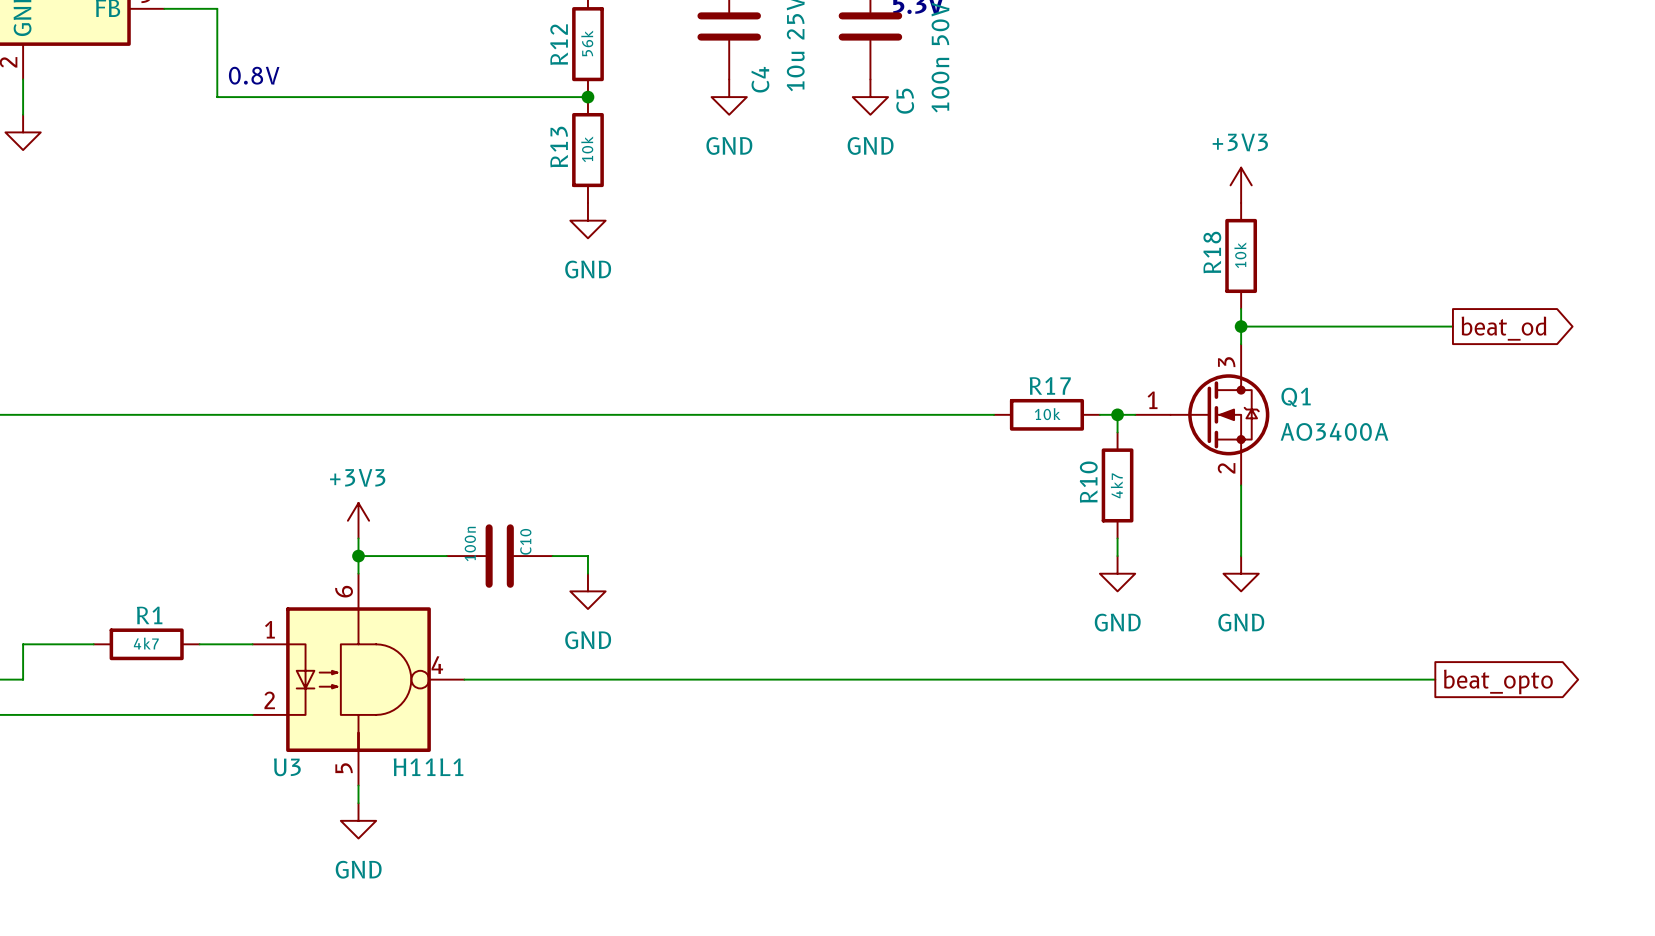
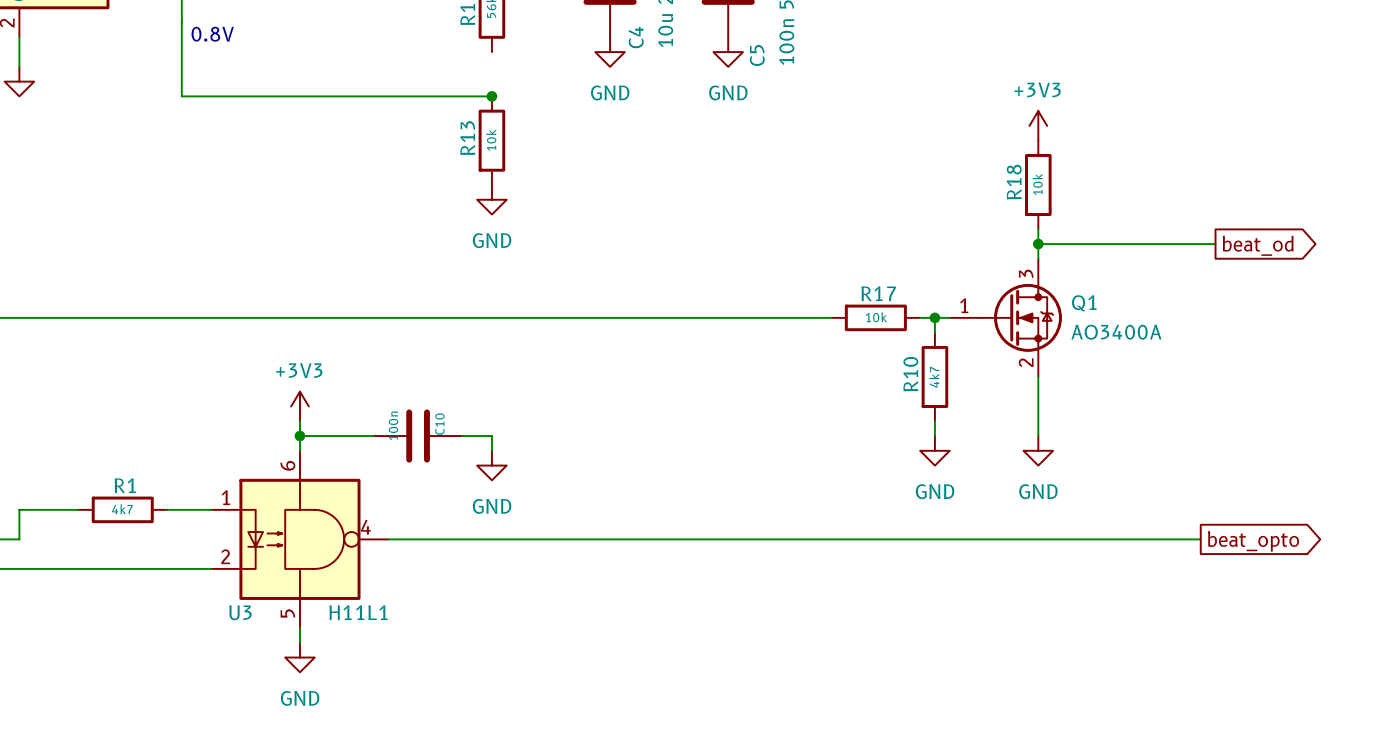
wire: (217, 97) (587, 97) -> (181, 52) (181, 96) (491, 96)
junction position: (587, 97) -> (491, 96)
R13 position: (587, 150) -> (491, 140)
power symbol position: GND (587, 220) -> GND (491, 199)

